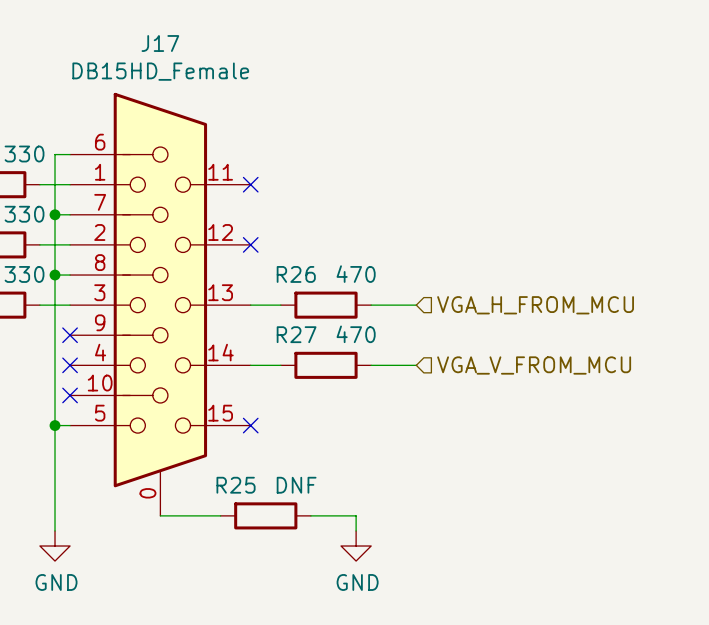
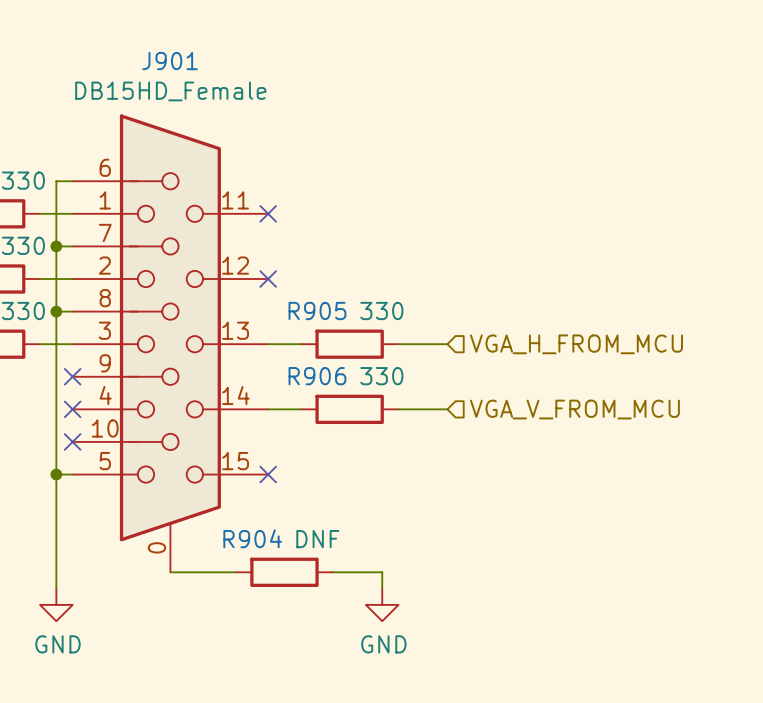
J17 name: J17 (160, 43) -> J901 (170, 61)
R26 name: R26 (296, 274) -> R905 (317, 310)
R26 value: 470 (356, 274) -> 330 (381, 310)
R27 name: R27 (296, 334) -> R906 (317, 376)
R27 value: 470 (356, 334) -> 330 (381, 376)
R25 name: R25 (236, 485) -> R904 (252, 538)

